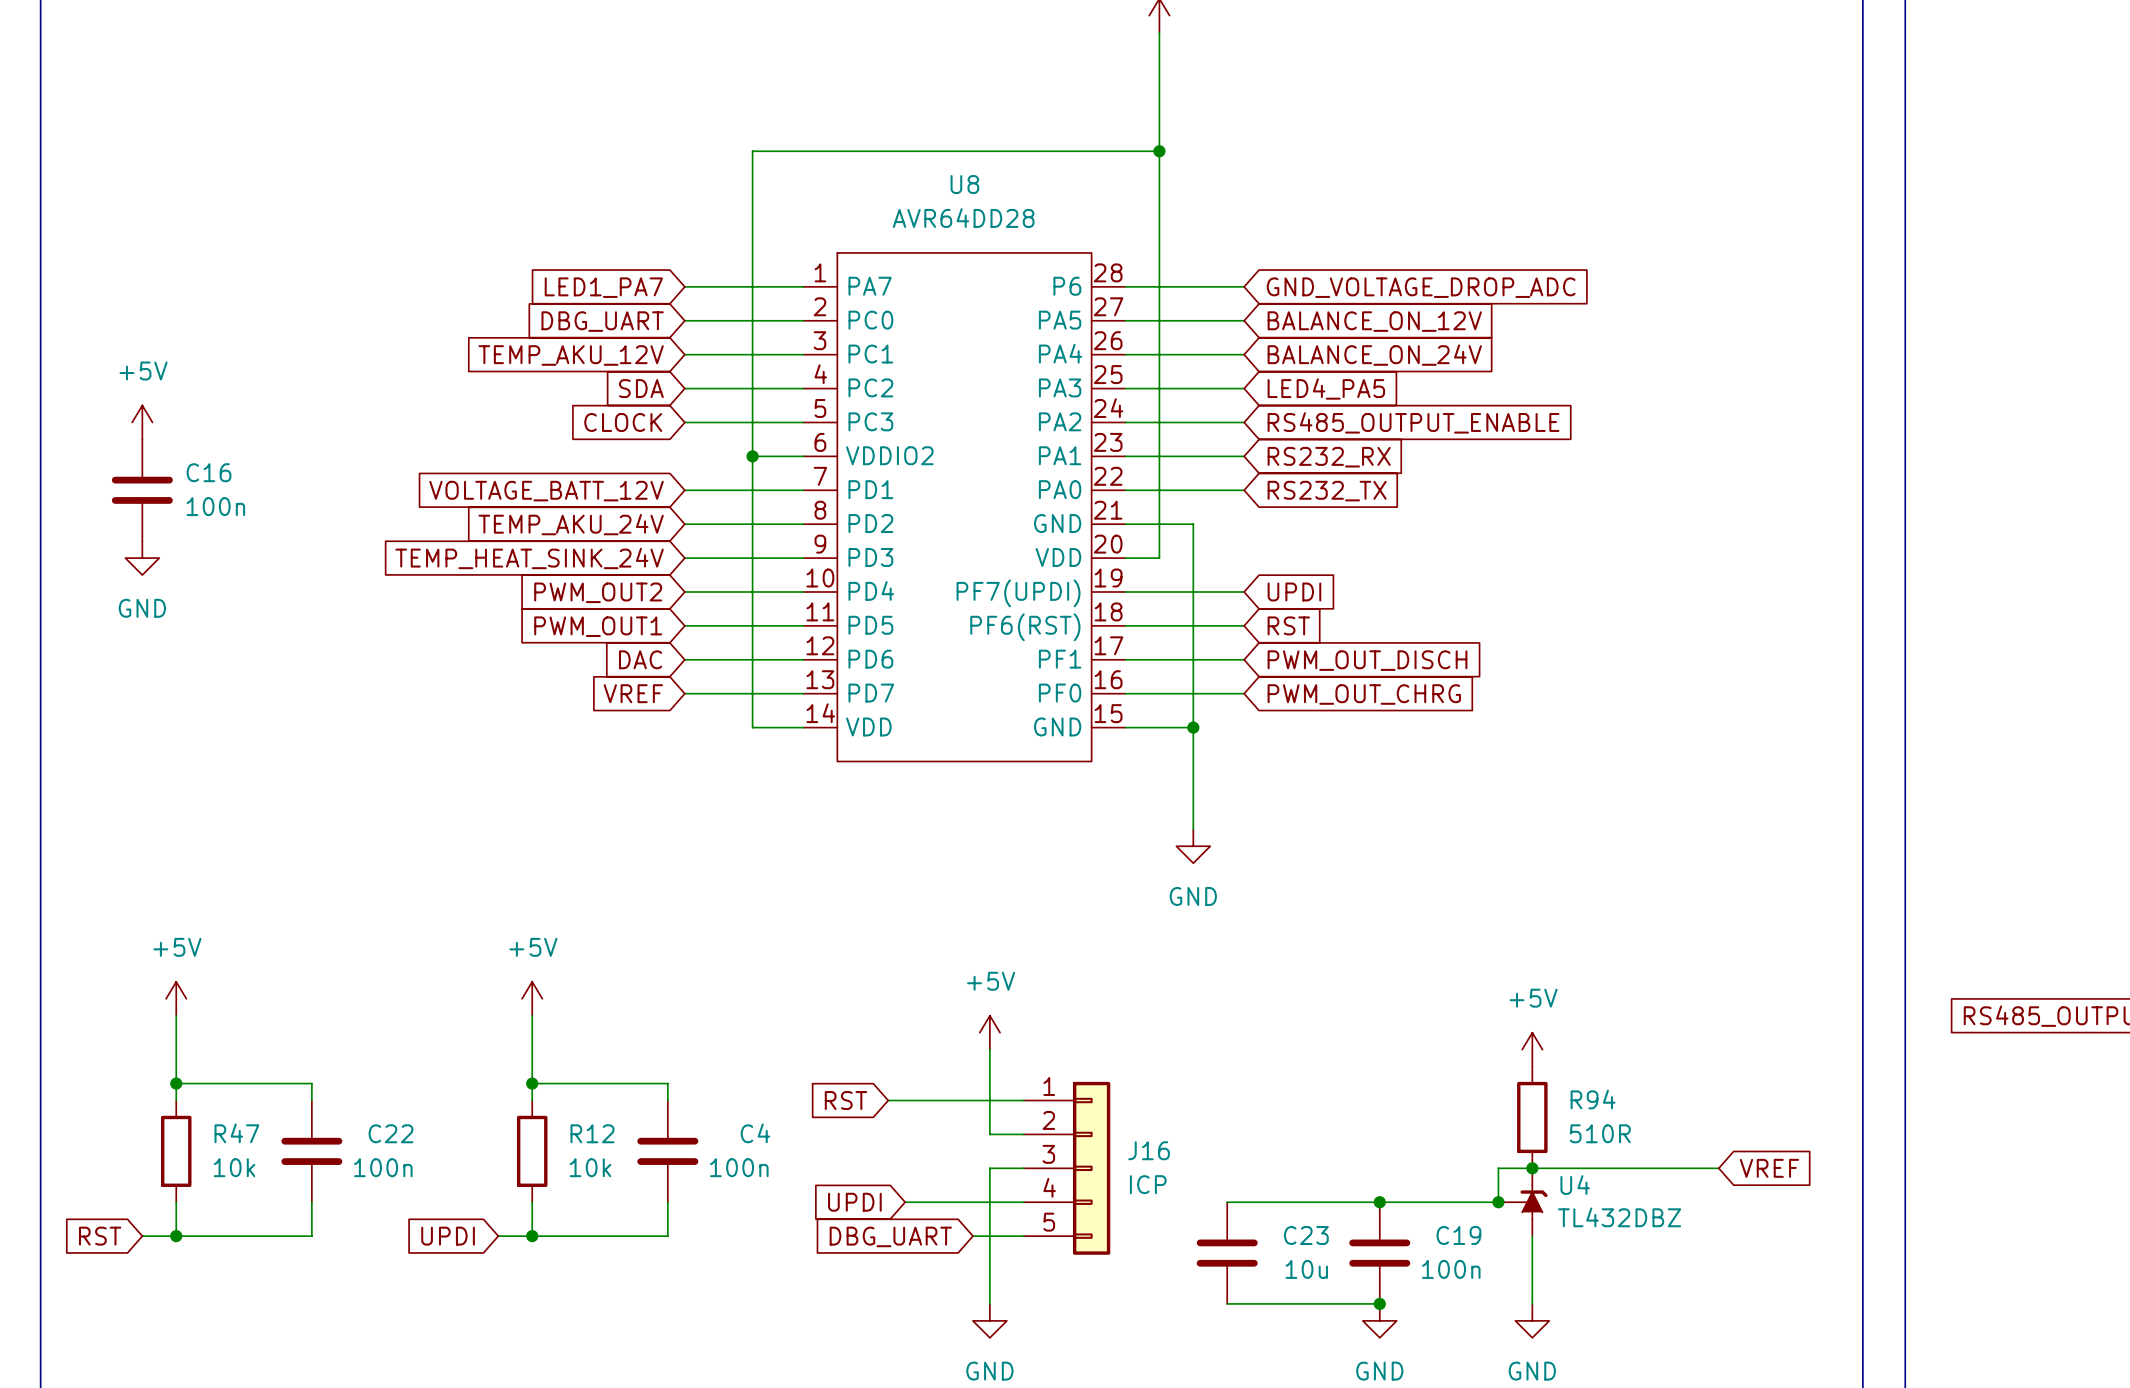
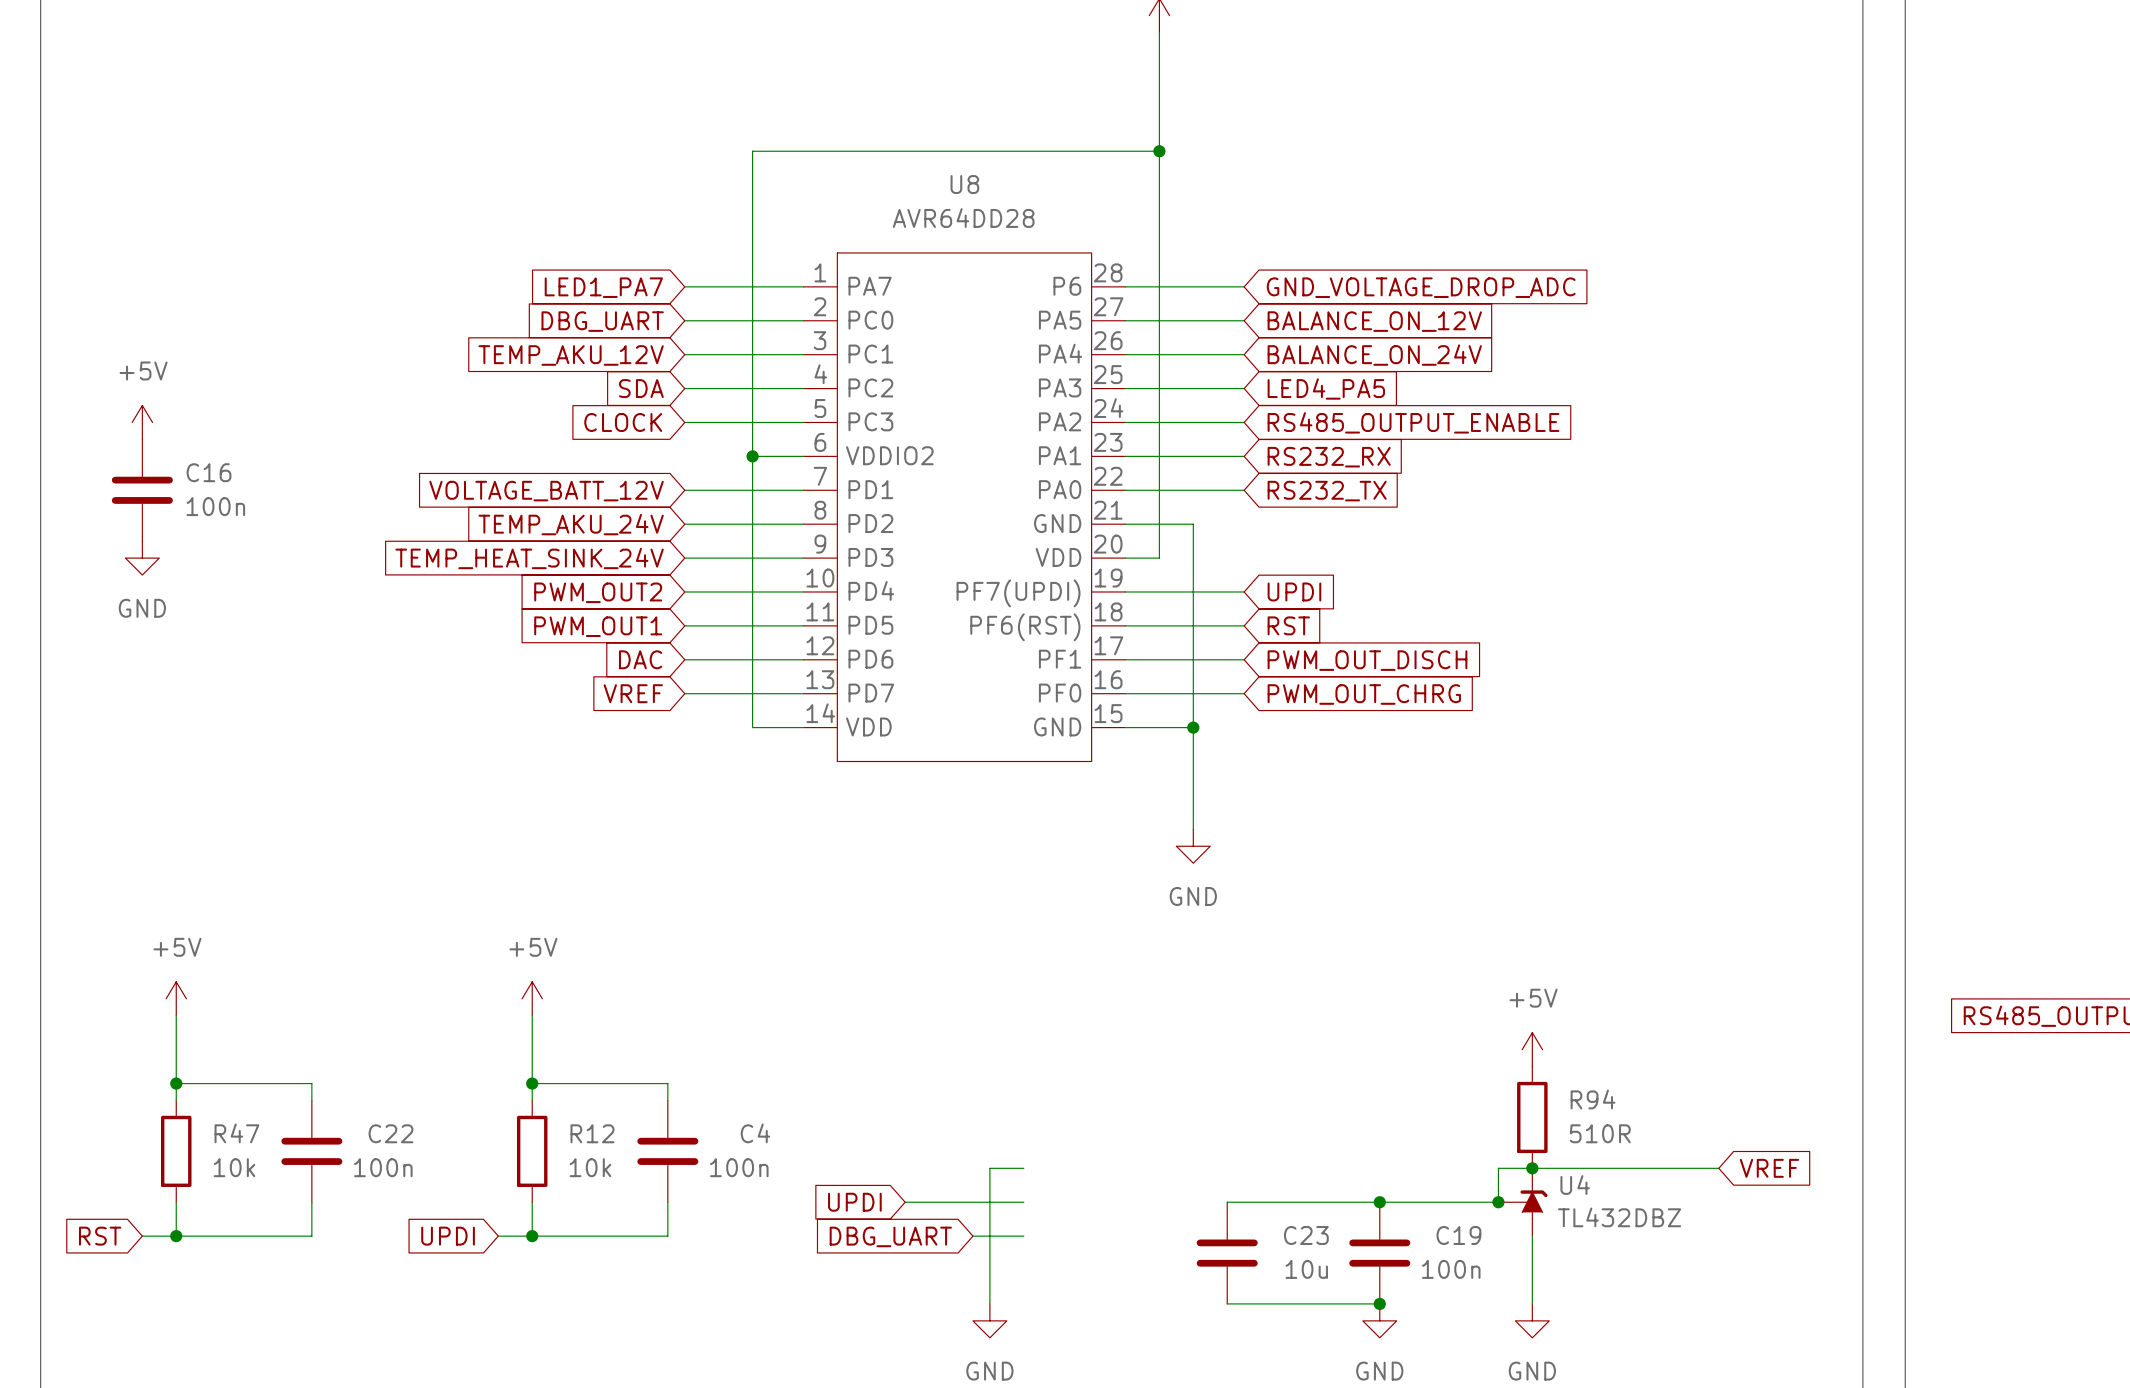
power symbol: +5V (989, 1032) -> none
wire: (989, 1049) (989, 1134) (1023, 1134) -> none
global label: RST (845, 1100) -> none
wire: (888, 1100) (1023, 1100) -> none
J16: ICP (1067, 1168) -> none

